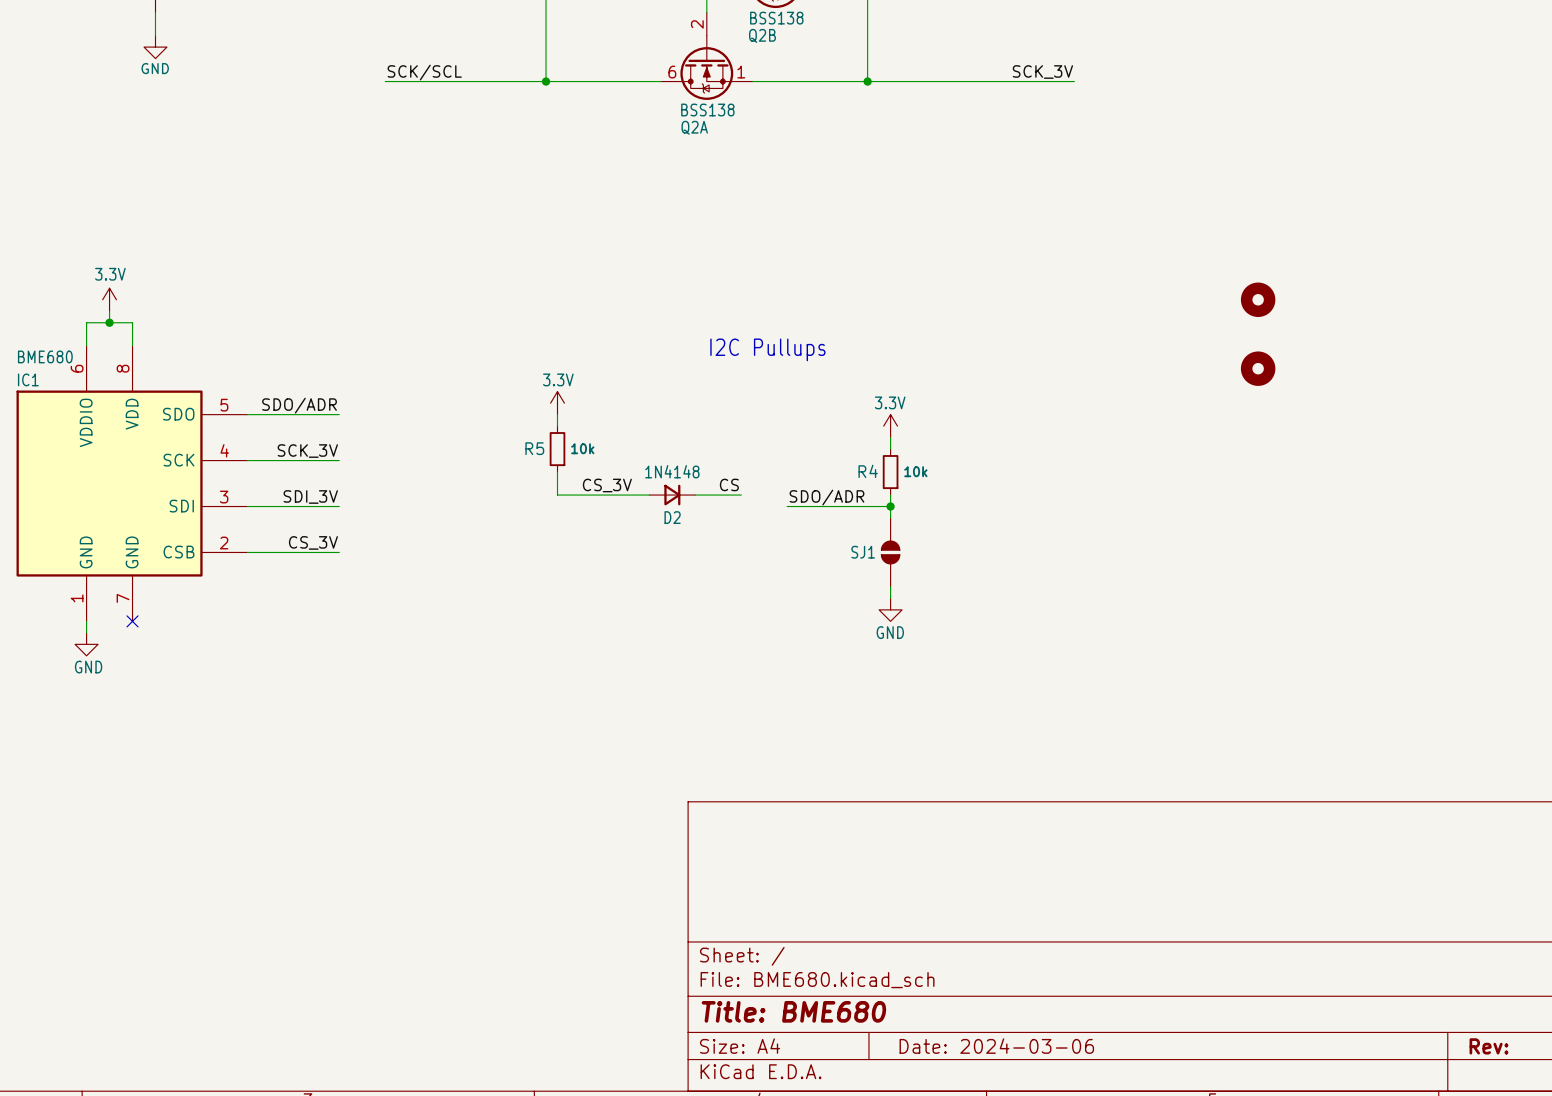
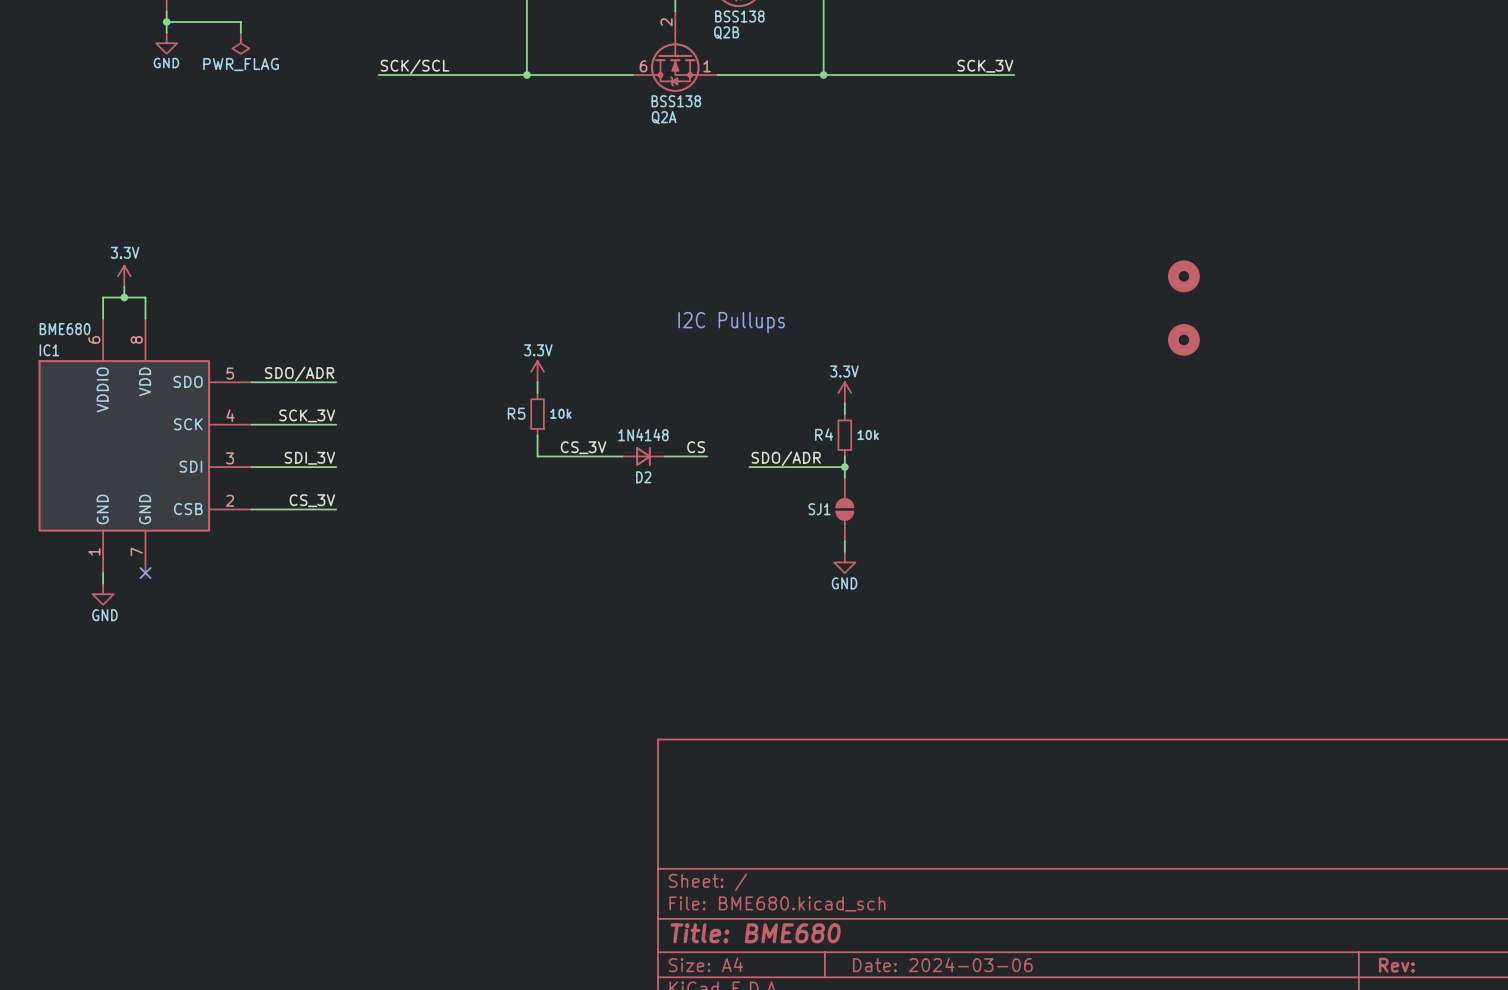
wire: none -> (166, 22) (240, 22) (240, 32)
junction: none -> (166, 22)
power symbol: none -> PWR_FLAG (240, 43)

